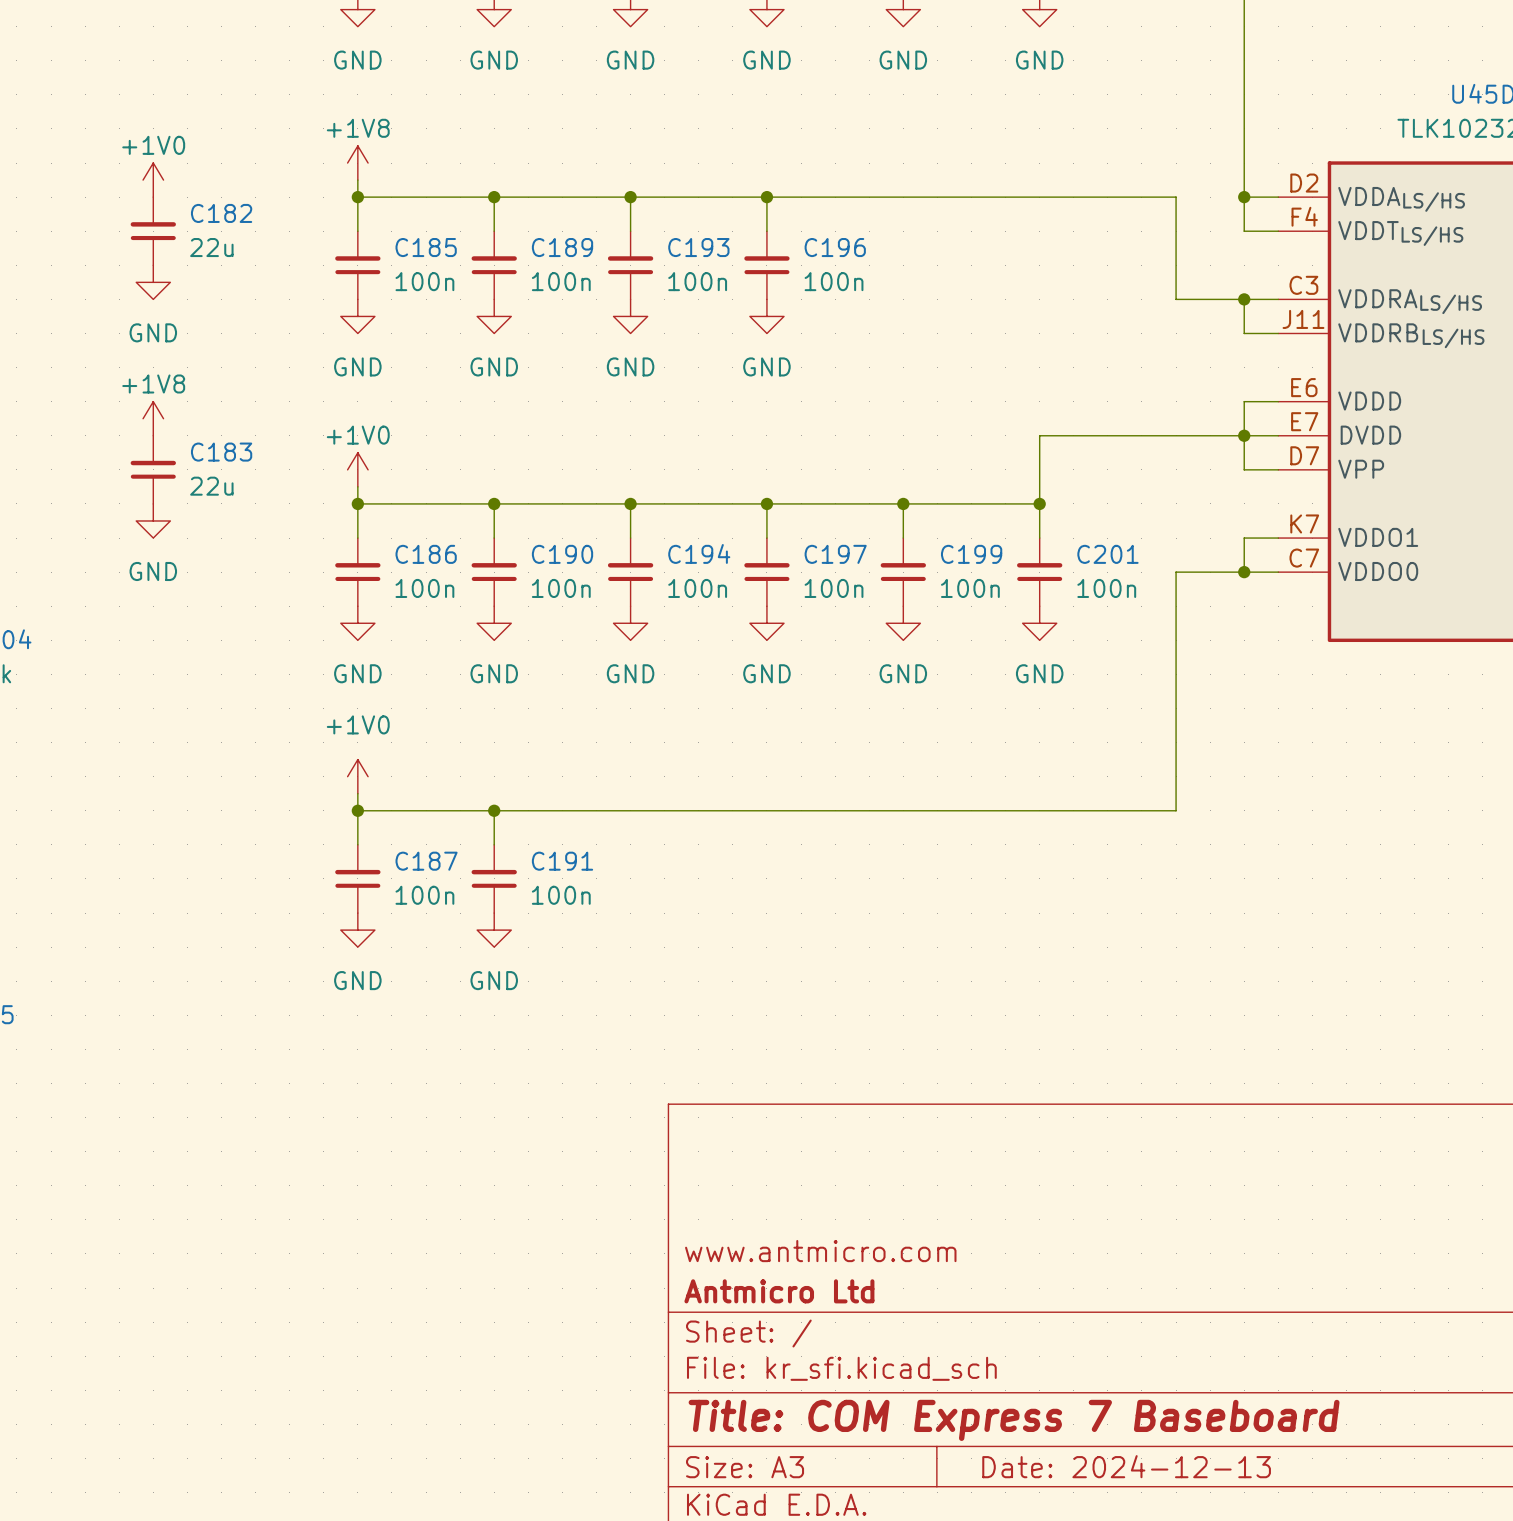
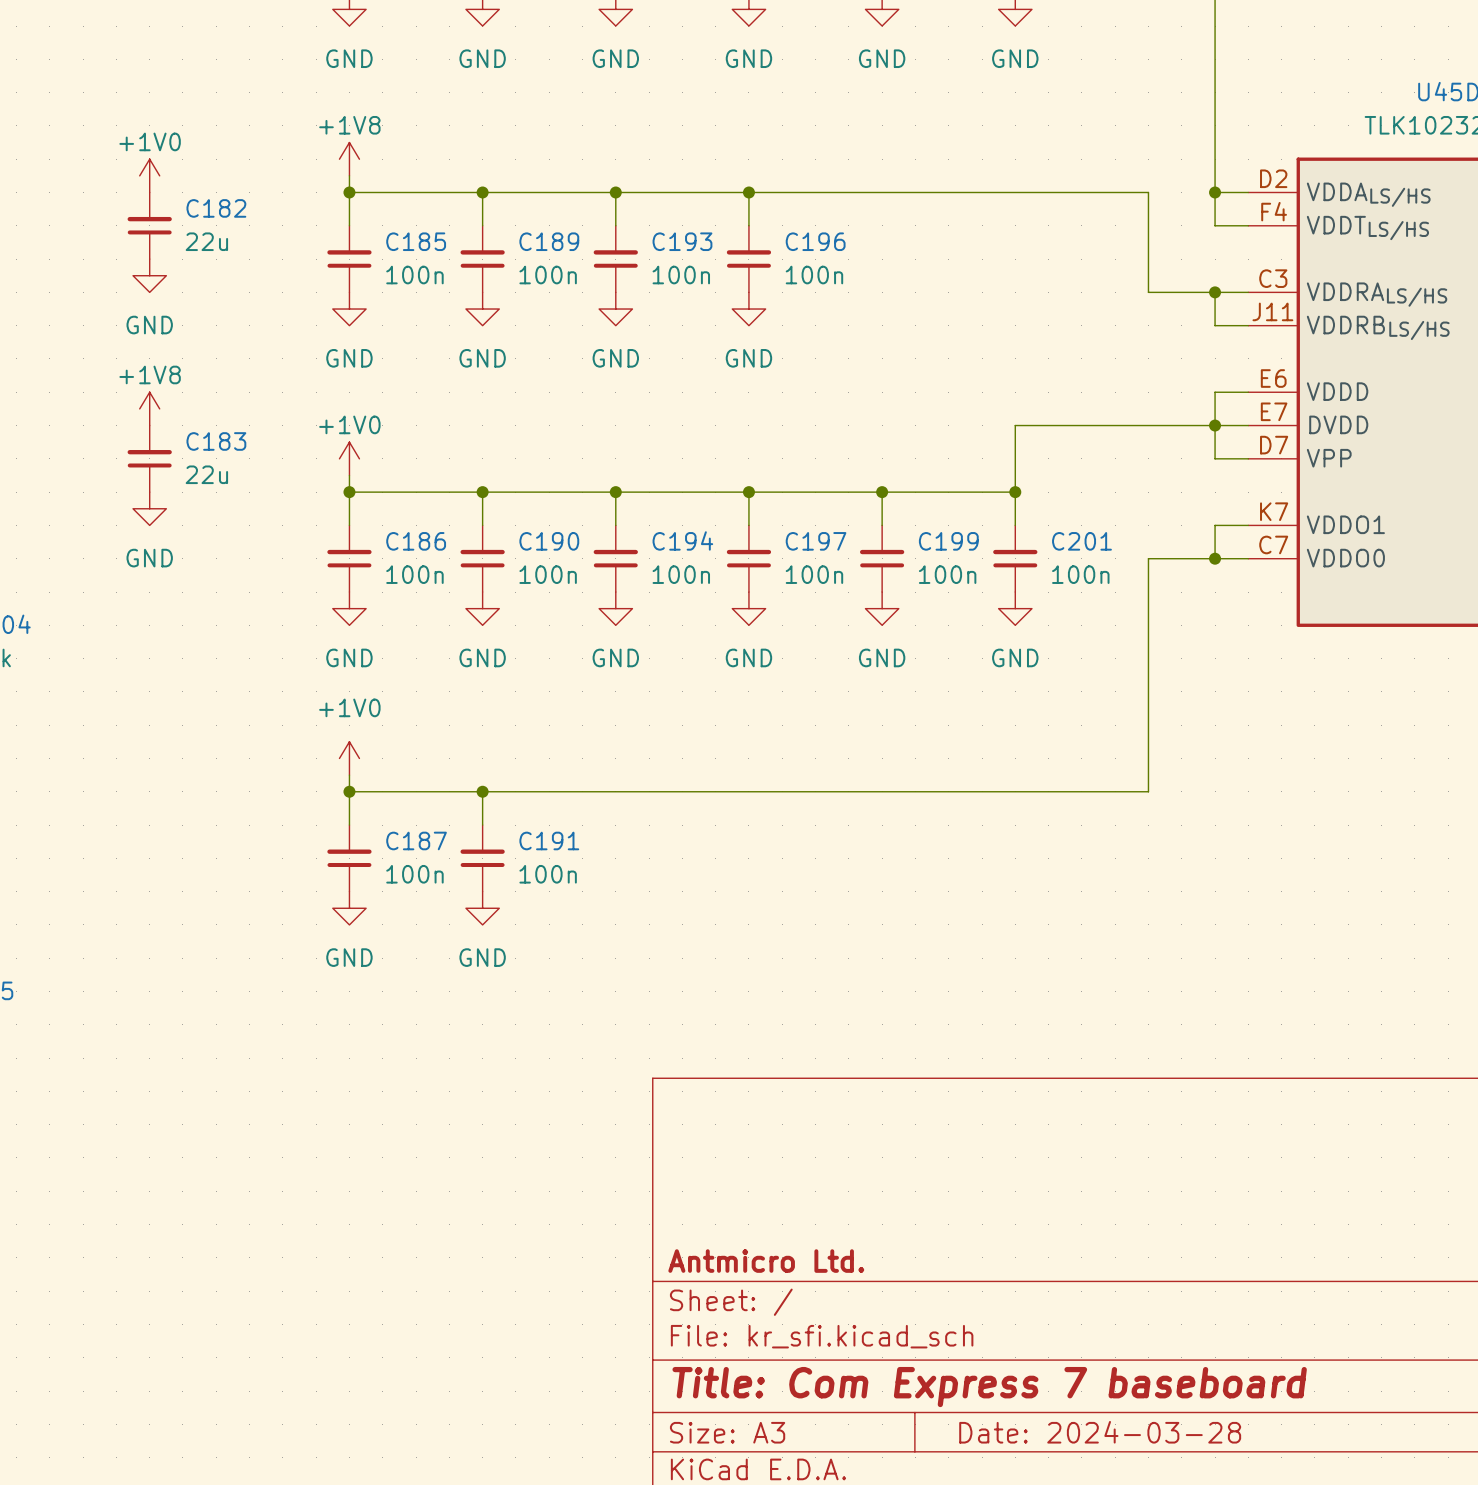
title block: www.antmicro.com (820, 1251) -> none
title block: Antmicro Ltd (779, 1291) -> Antmicro Ltd. (766, 1261)
title block: Title: COM Express 7 Baseboard (1014, 1420) -> Title: Com Express 7 baseboard (989, 1387)
title block: Date: 2024-12-13 (1126, 1466) -> Date: 2024-03-28 (1100, 1432)

